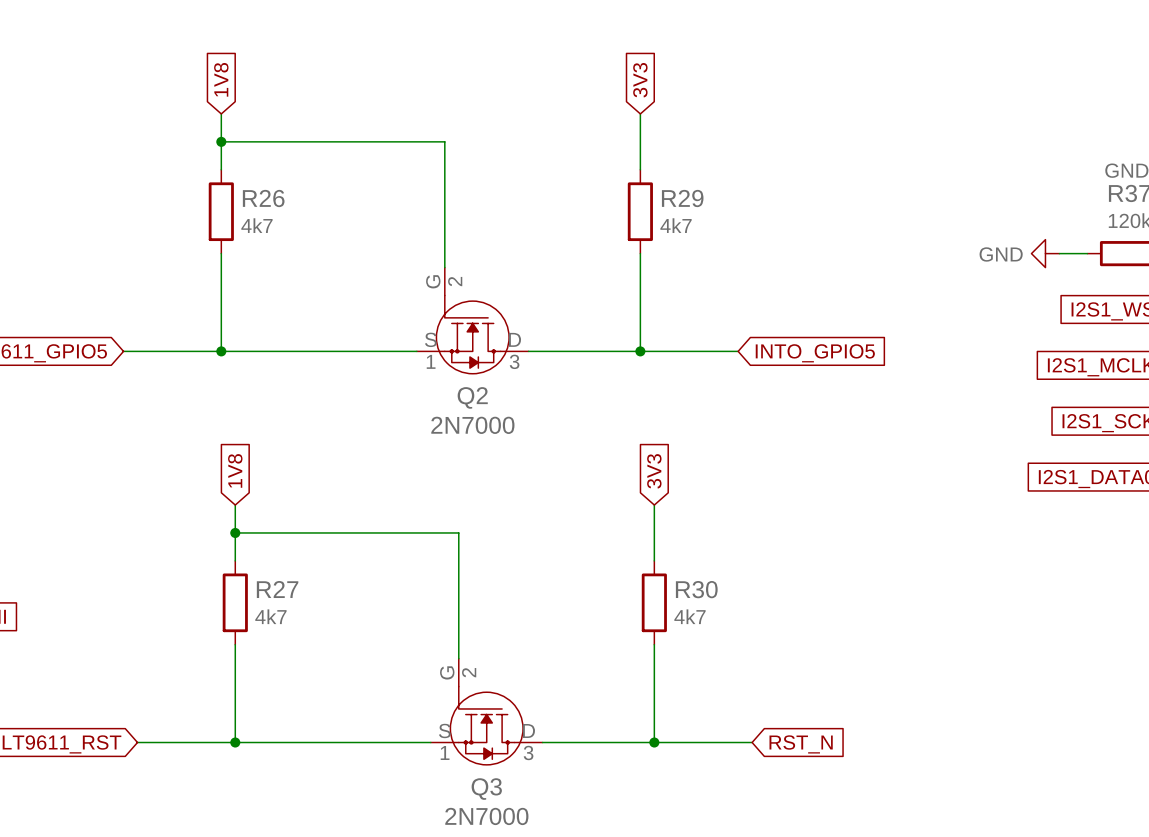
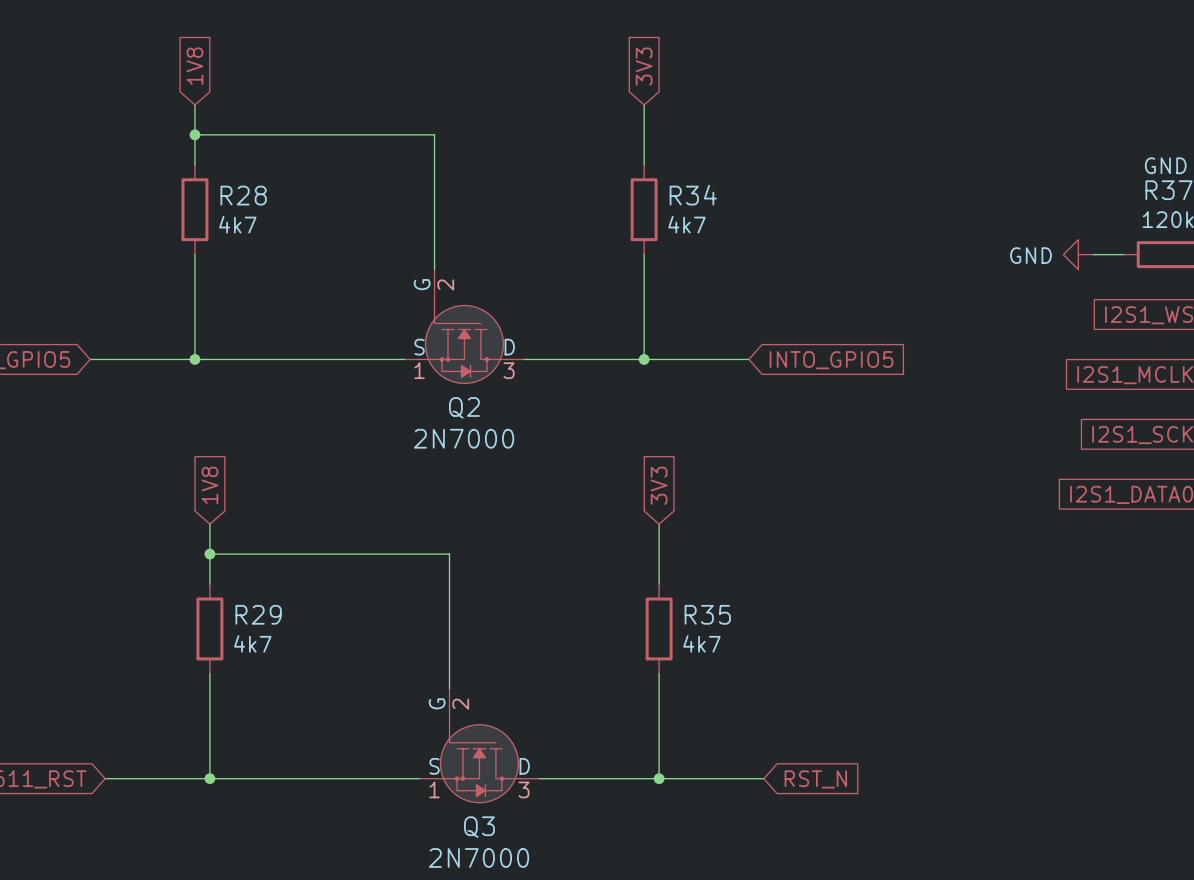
R26 name: R26 (263, 198) -> R28 (243, 195)
R29 name: R29 (682, 198) -> R34 (693, 195)
R27 name: R27 (277, 589) -> R29 (258, 614)
R30 name: R30 (696, 589) -> R35 (707, 614)

